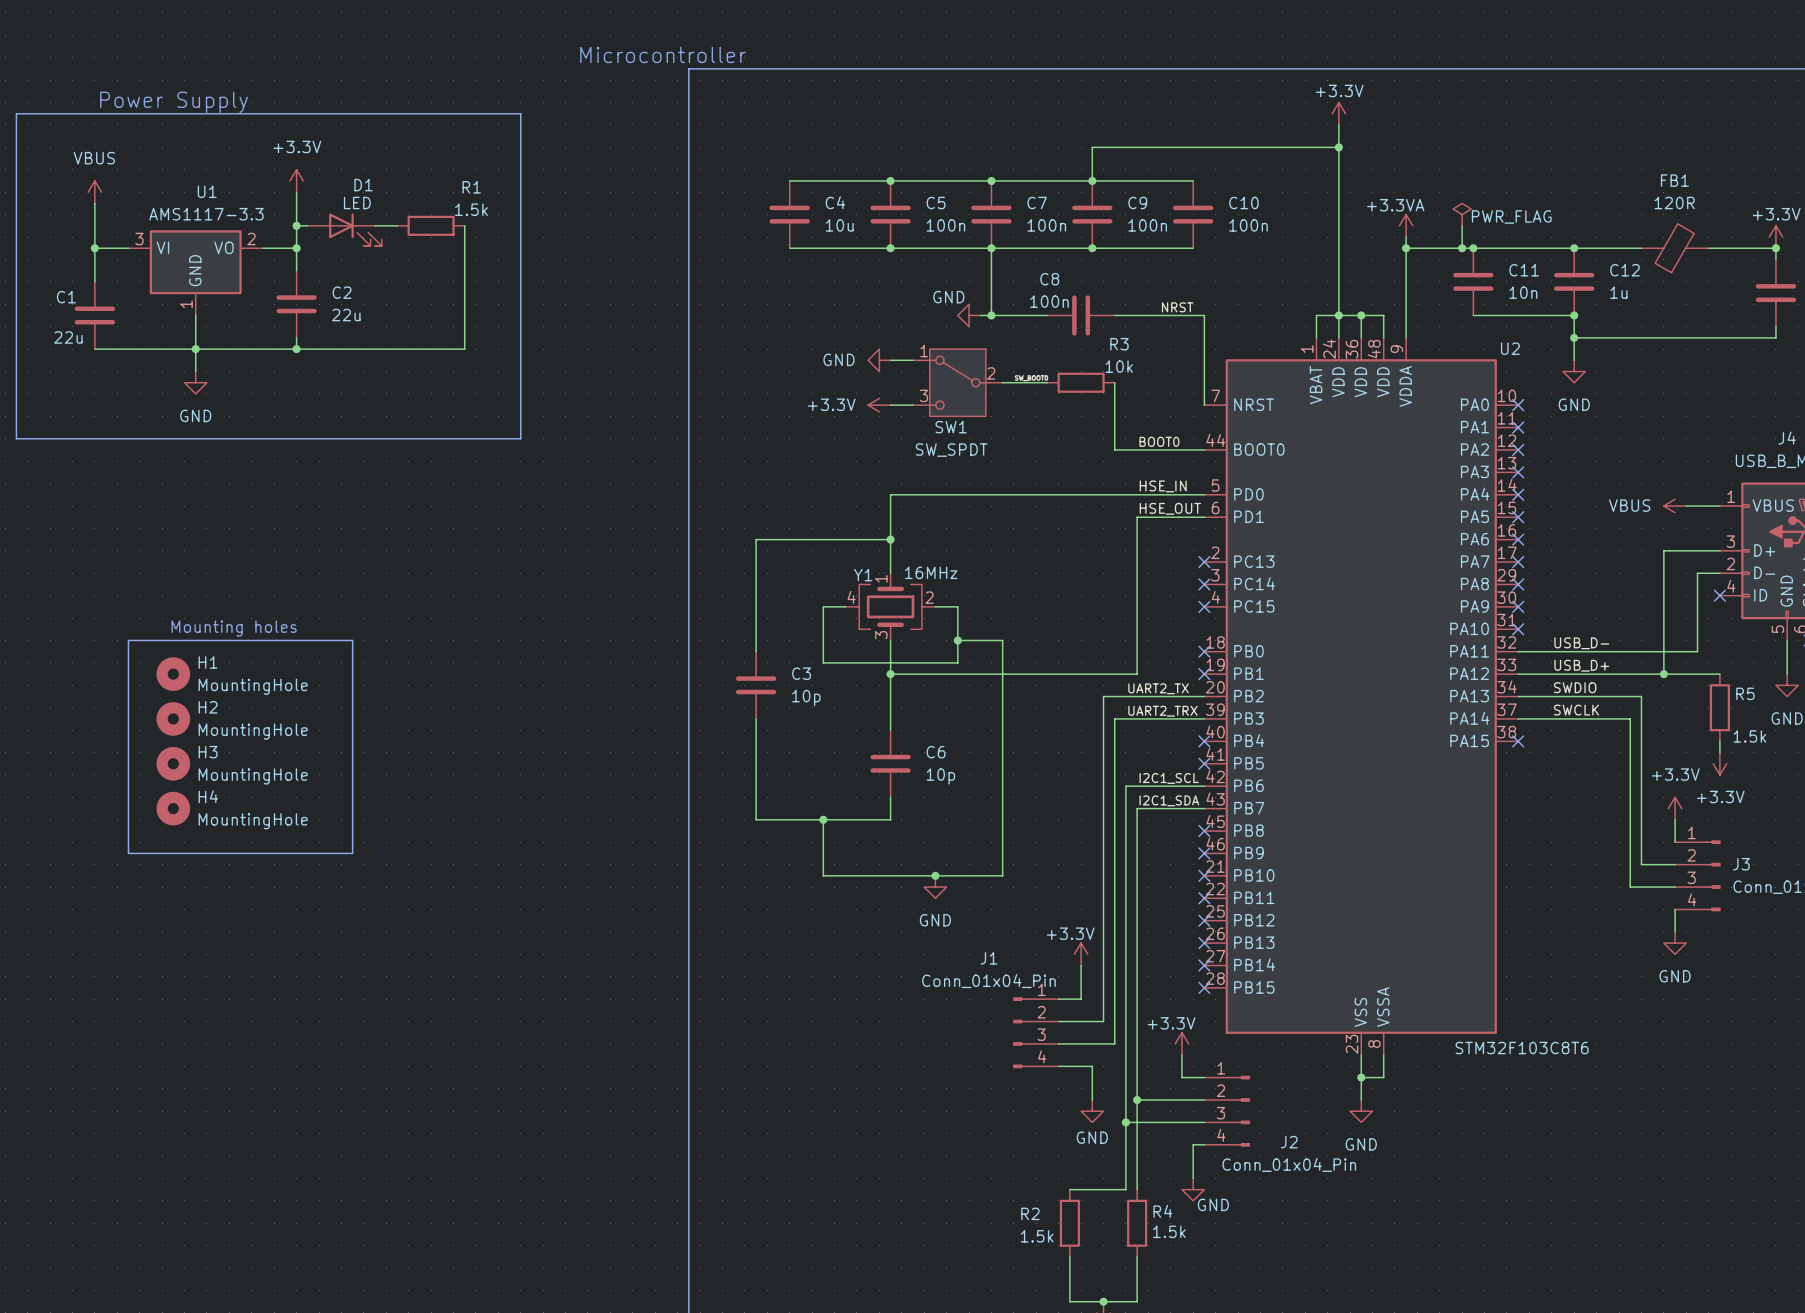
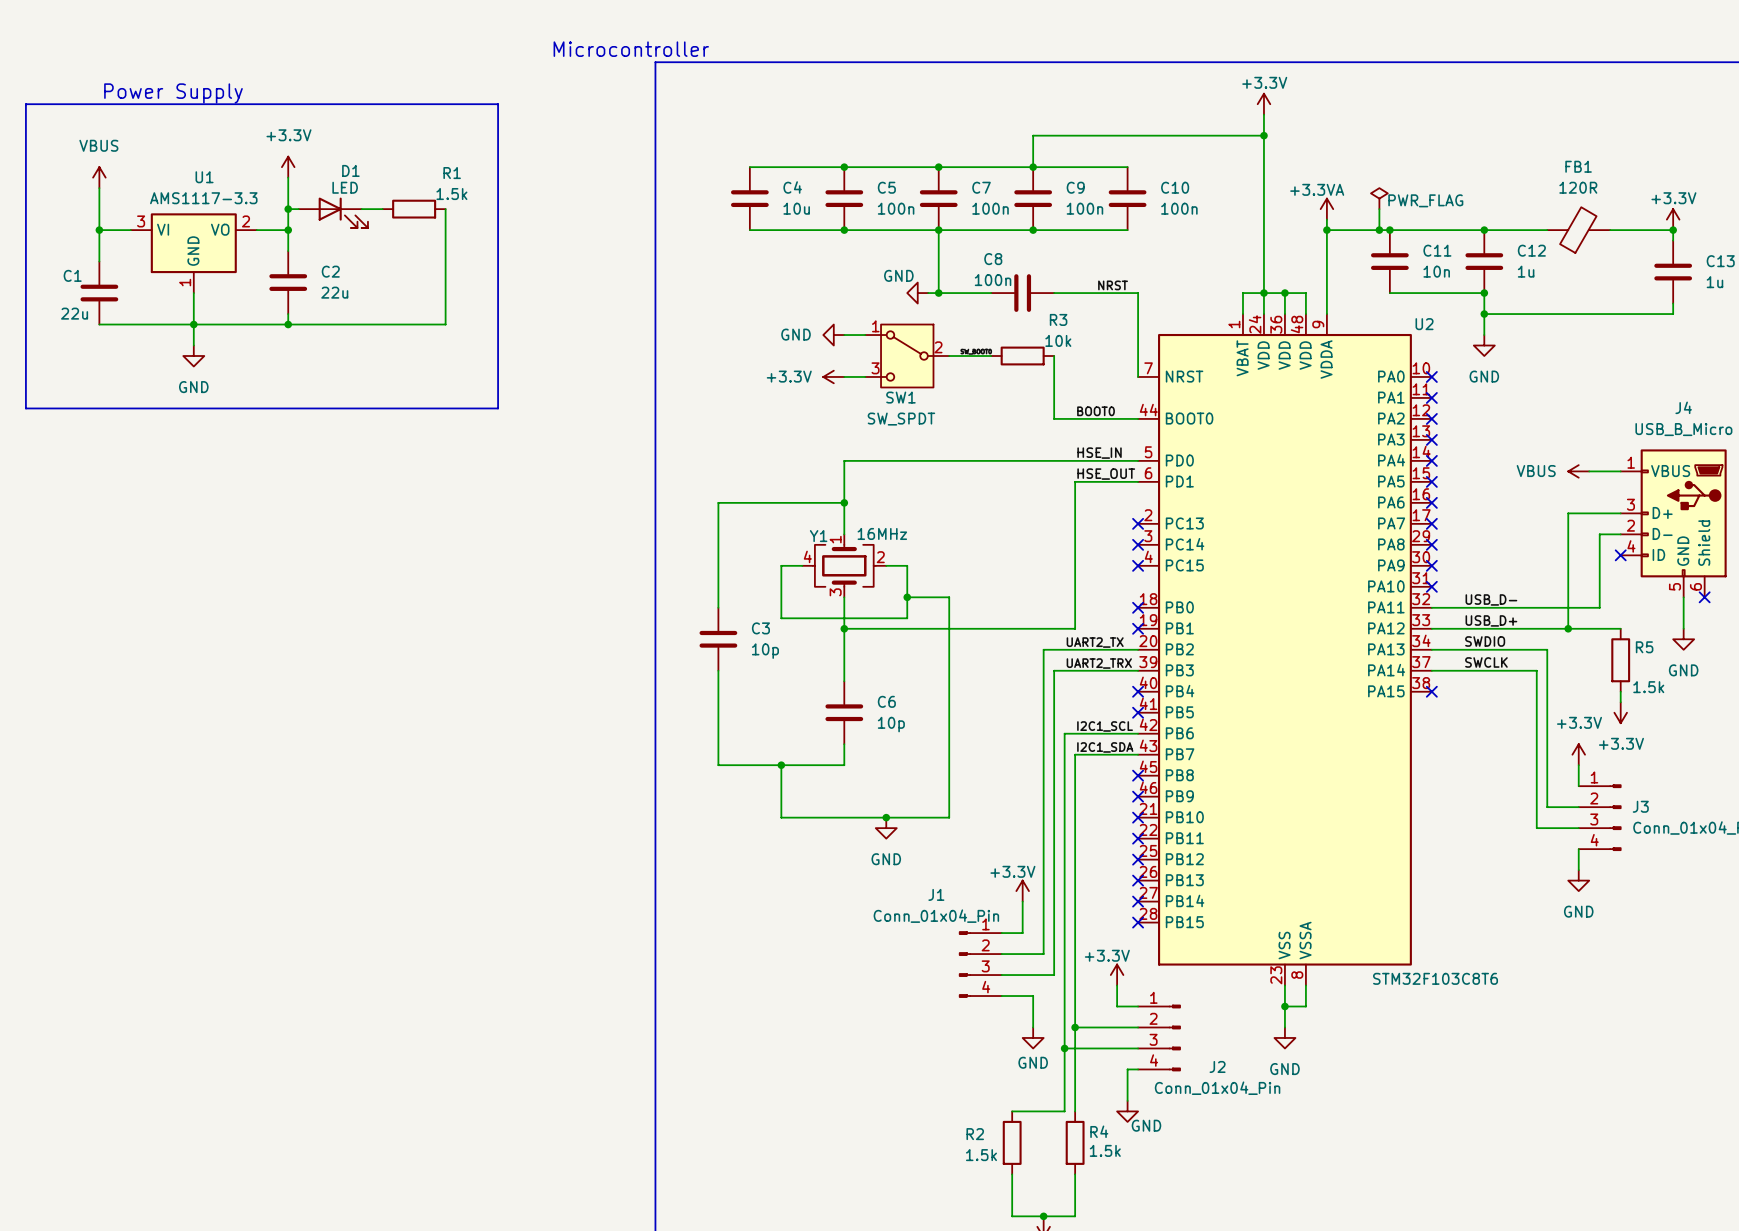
text: Mounting holes (234, 628) -> none
line: (128, 640) (352, 640) (352, 853) (128, 853) (128, 640) -> none
H1: MountingHole (173, 674) -> none
H2: MountingHole (173, 718) -> none
H3: MountingHole (173, 763) -> none
H4: MountingHole (173, 808) -> none

